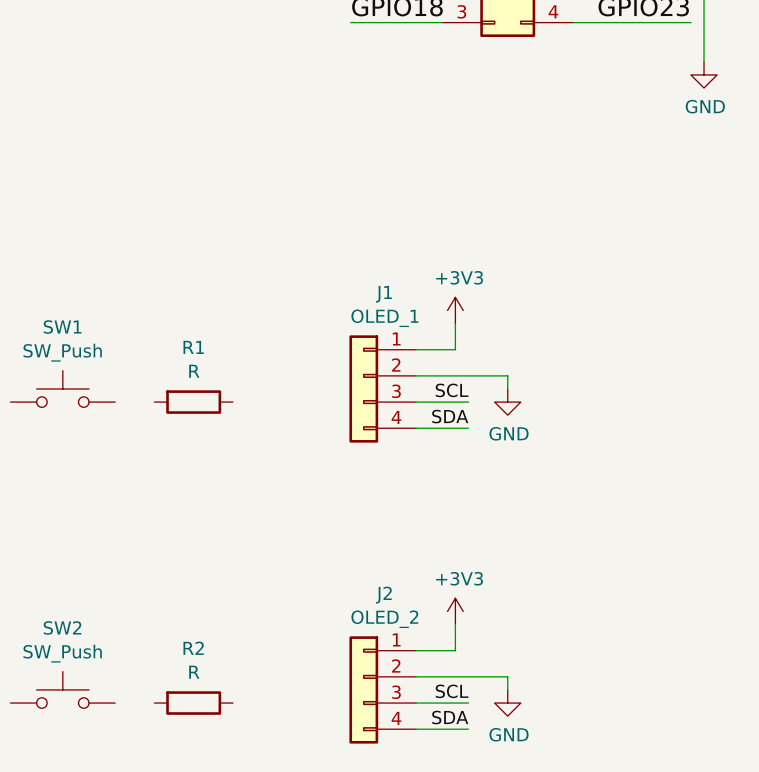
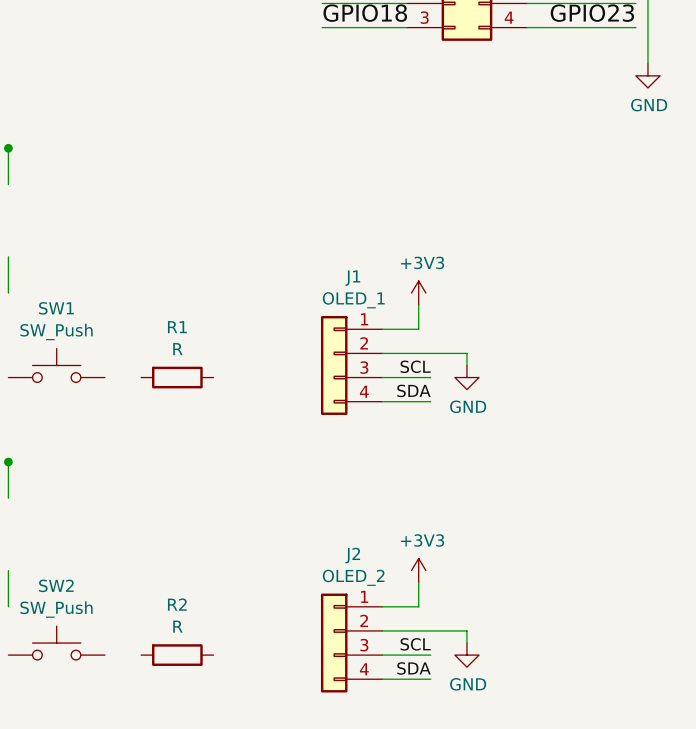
wire: none -> (8, 148) (8, 184)
junction: none -> (8, 148)
wire: none -> (8, 256) (8, 293)
wire: none -> (8, 462) (8, 498)
junction: none -> (8, 462)
wire: none -> (8, 570) (8, 606)

